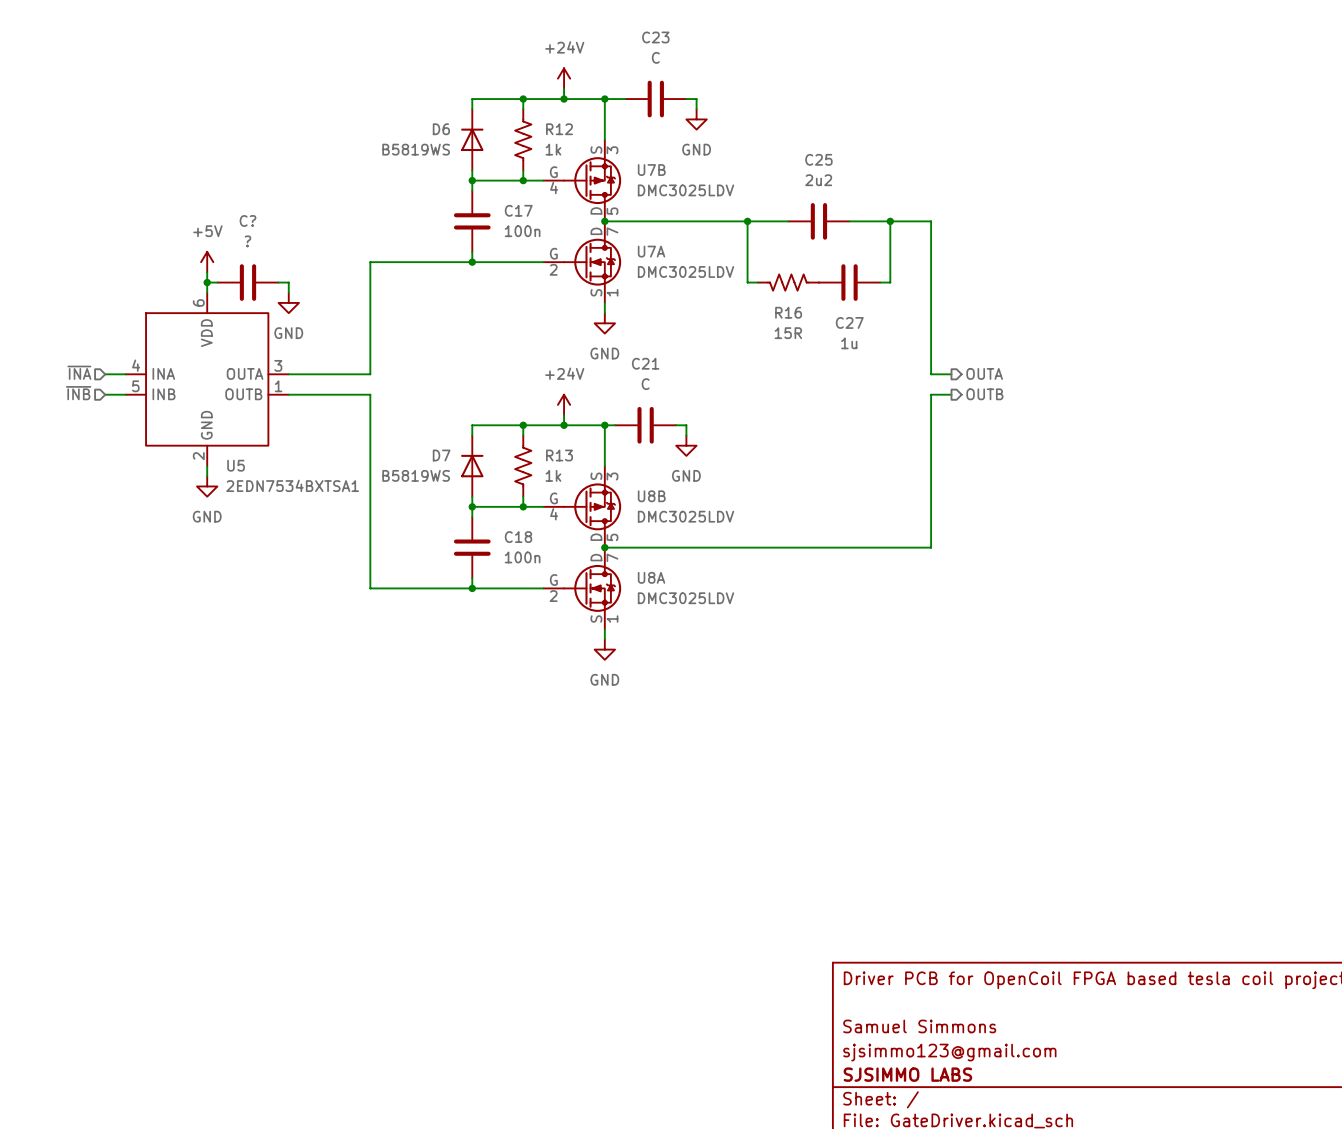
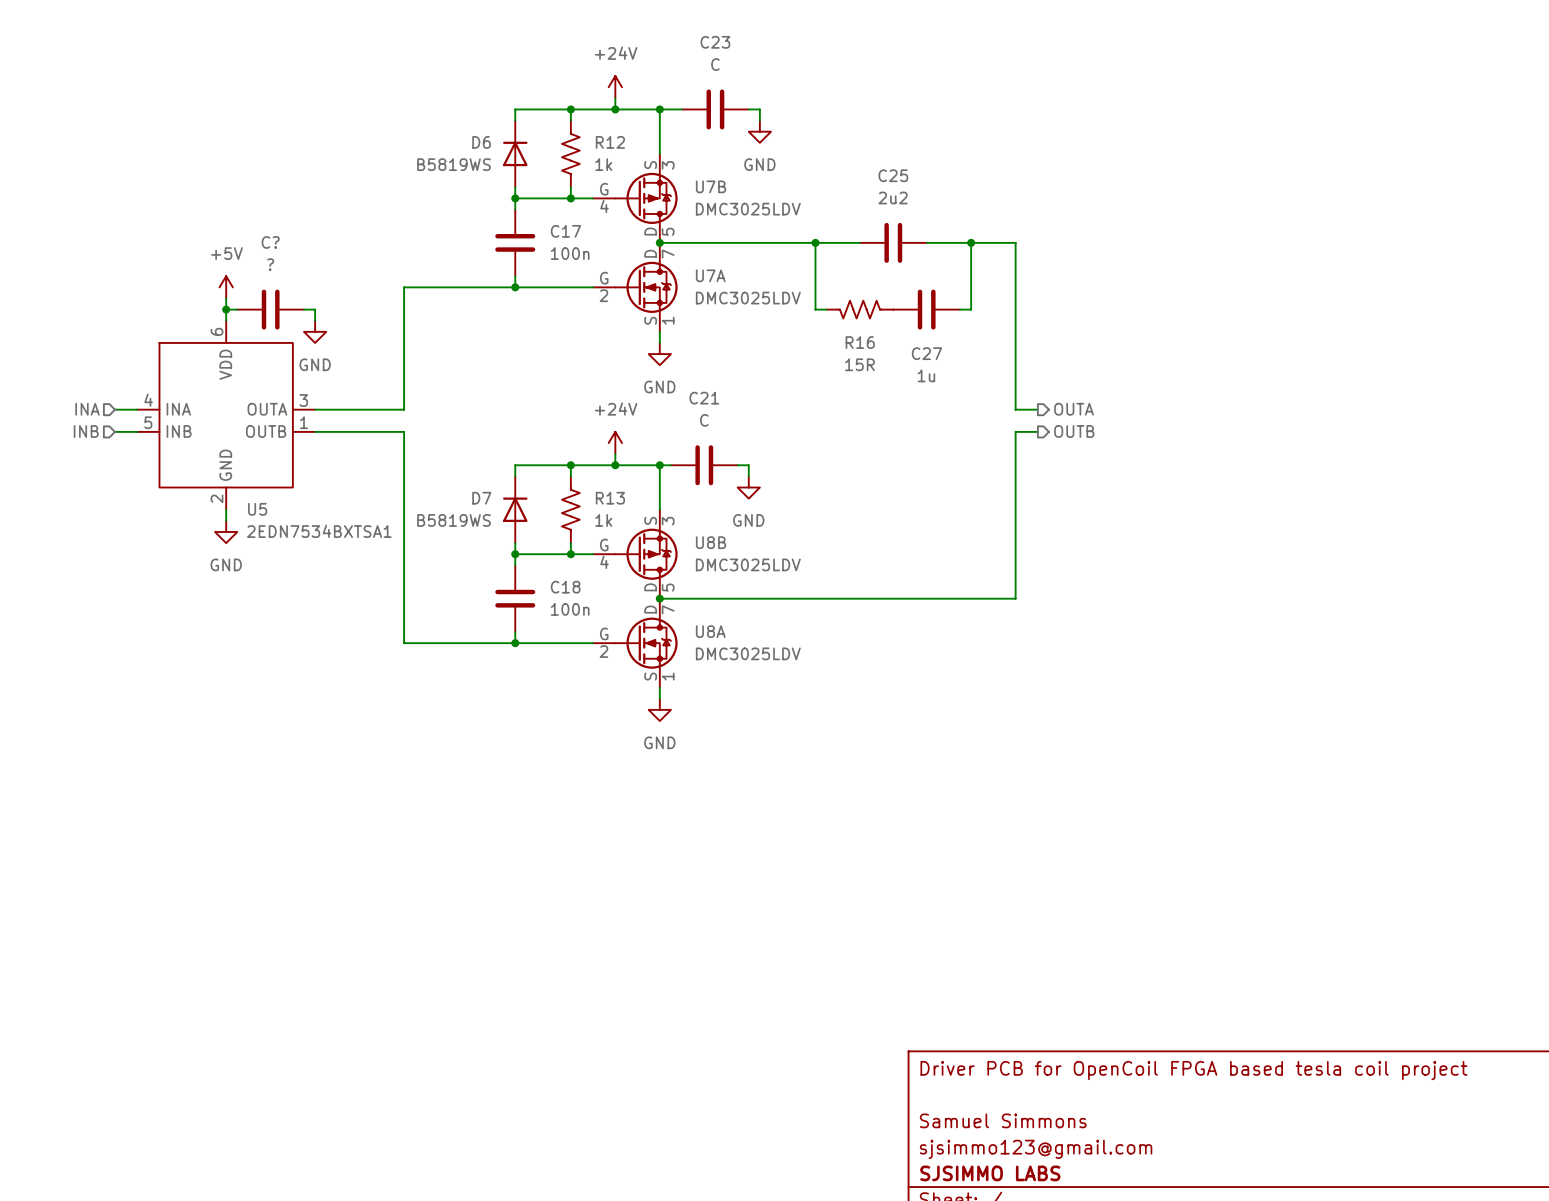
hierarchical label: ~{INA} (79, 372) -> INA (87, 409)
hierarchical label: ~{INB} (78, 393) -> INB (86, 431)

